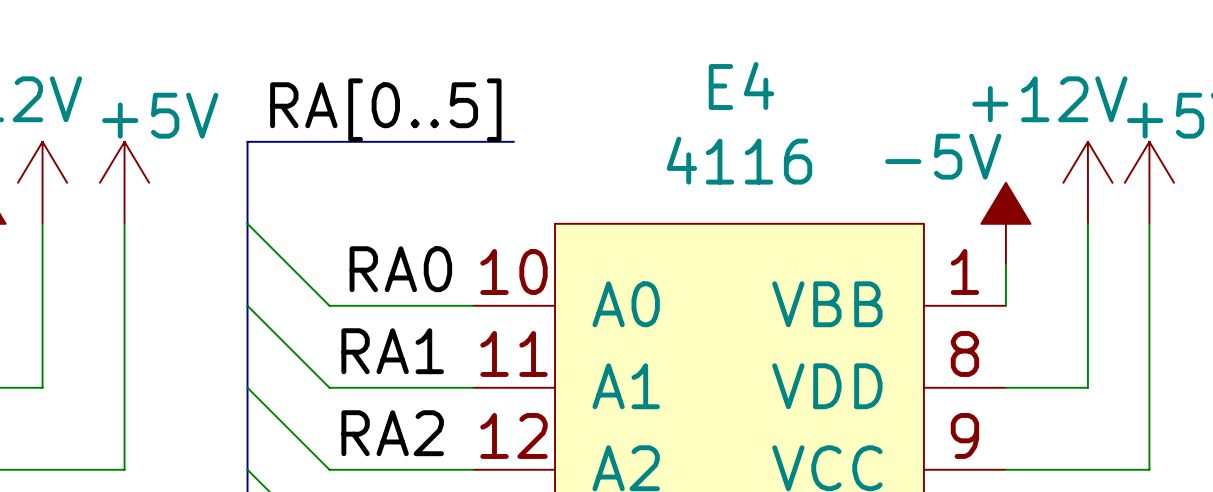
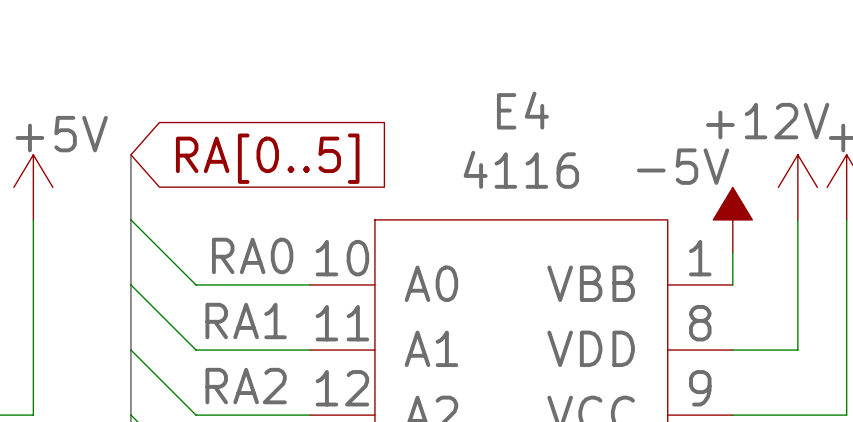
label: RA[0..5] (385, 110) -> none
bus: (247, 141) (514, 141) -> none
global label: none -> RA[0..5] (267, 158)

